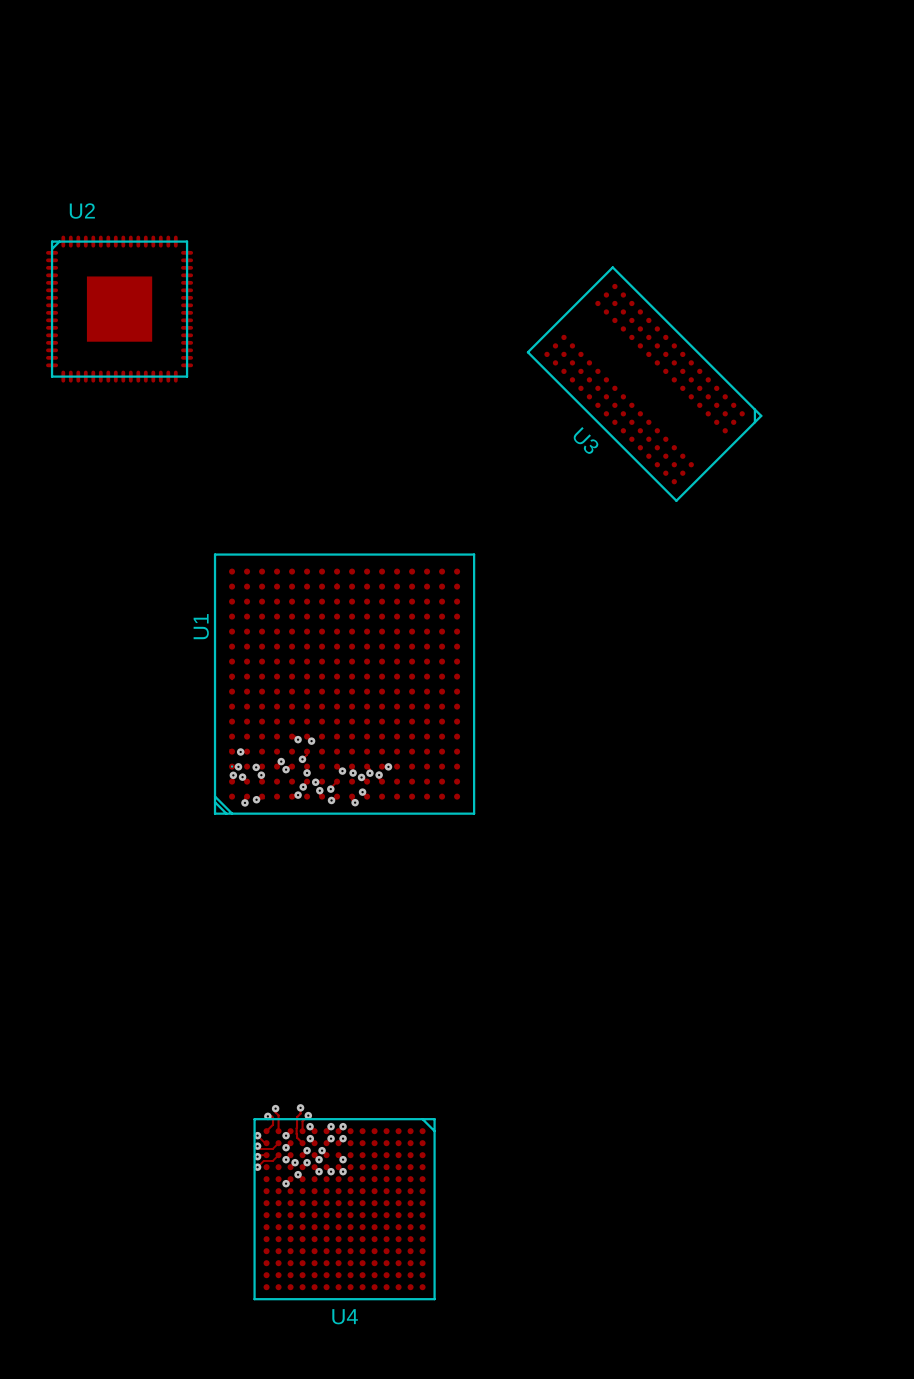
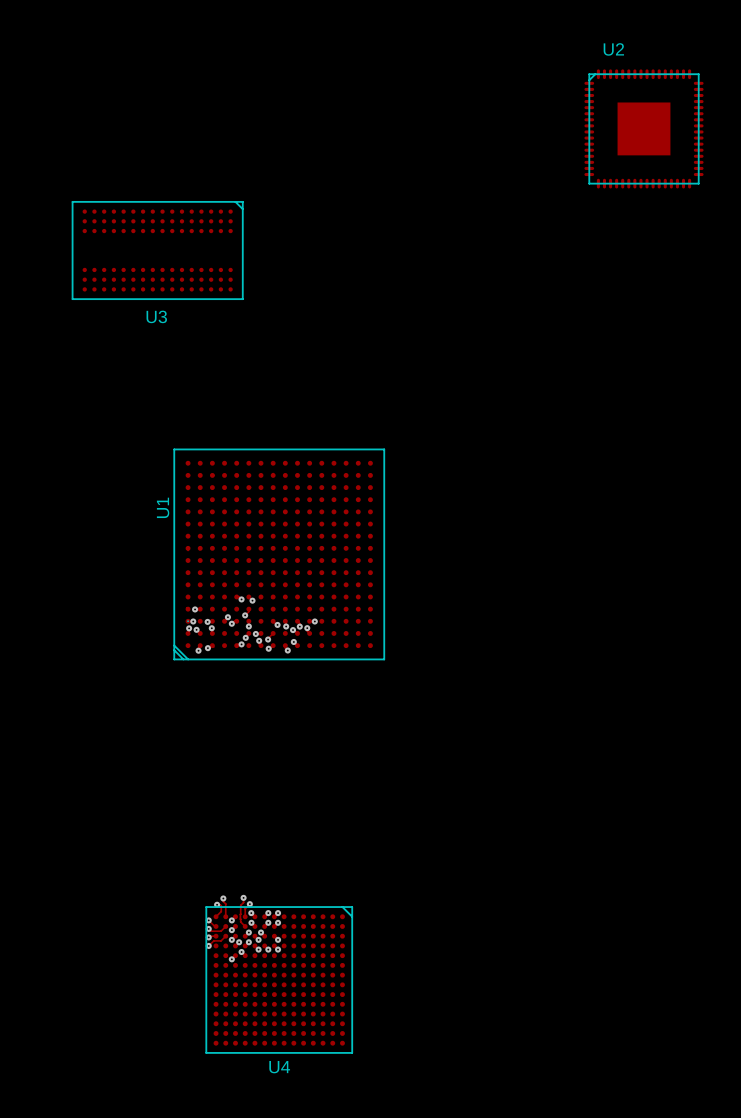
U2 position: (119, 309) -> (643, 128)
U3 rotation: 0° (644, 384) -> 45° counterclockwise (157, 250)
U3 position: (644, 384) -> (157, 250)

